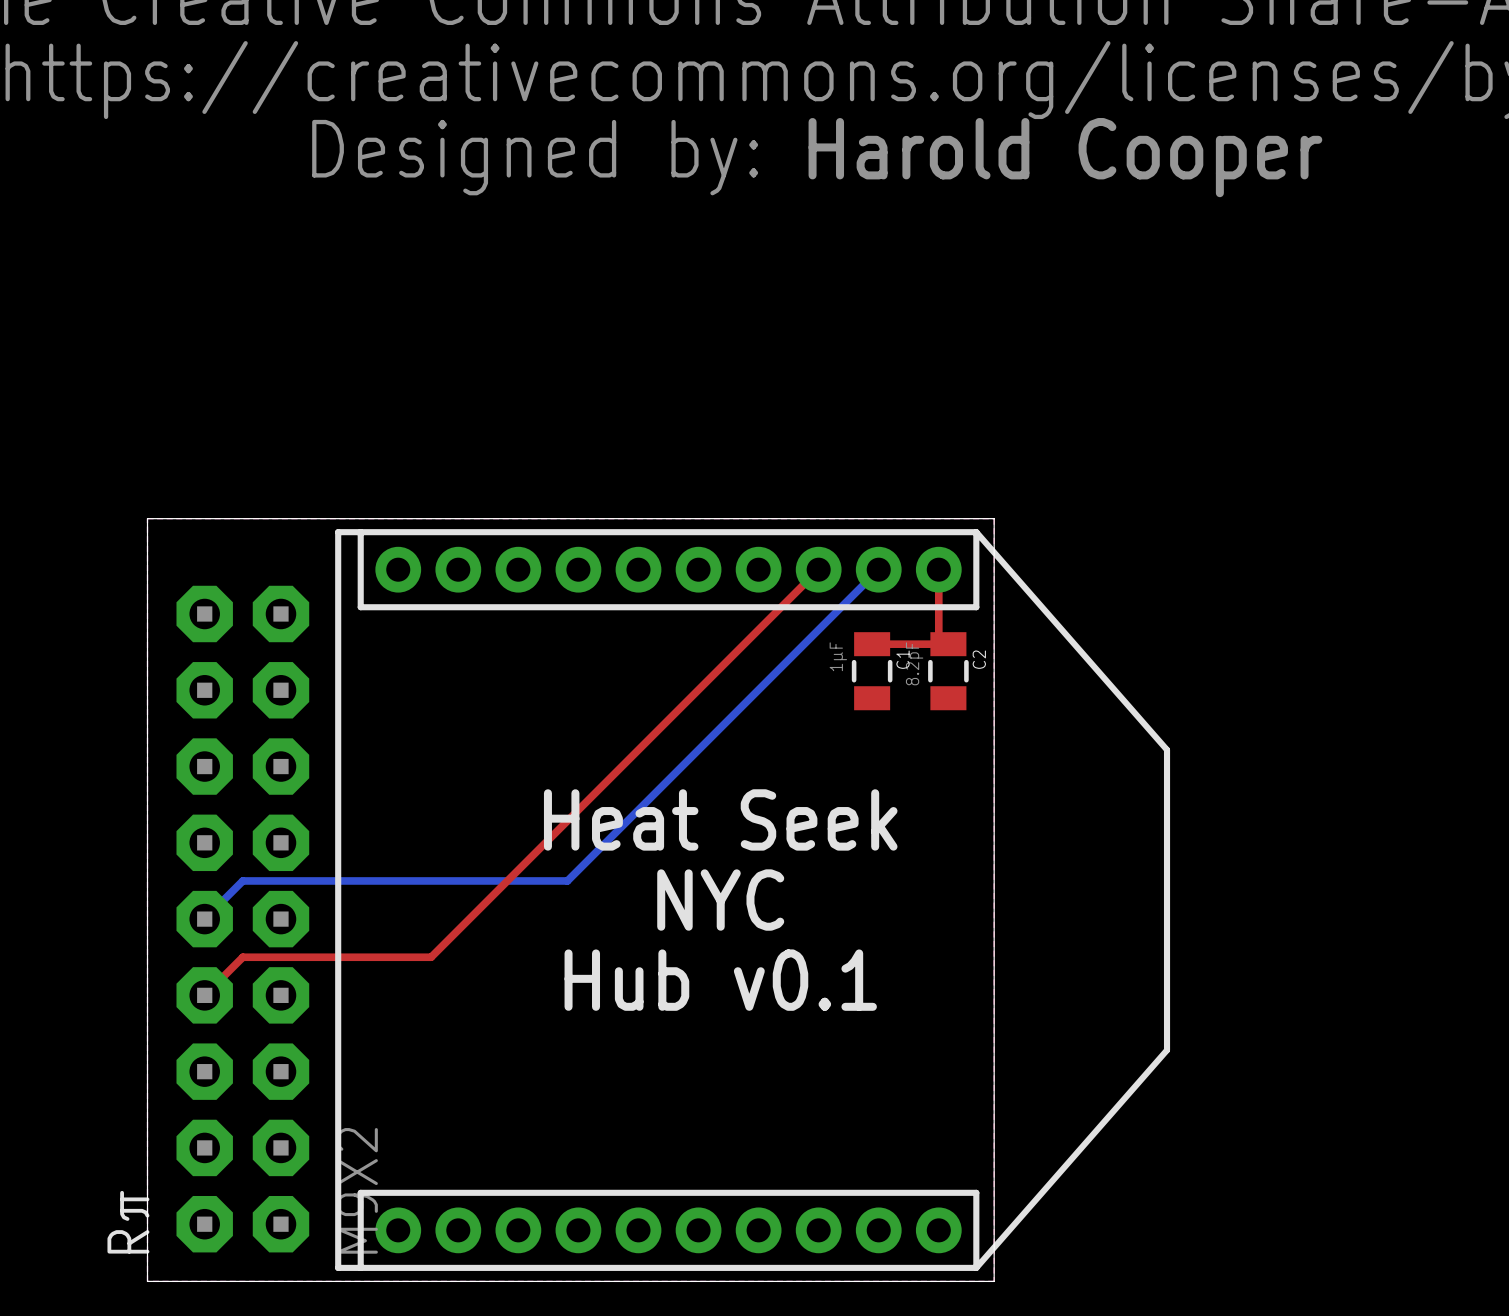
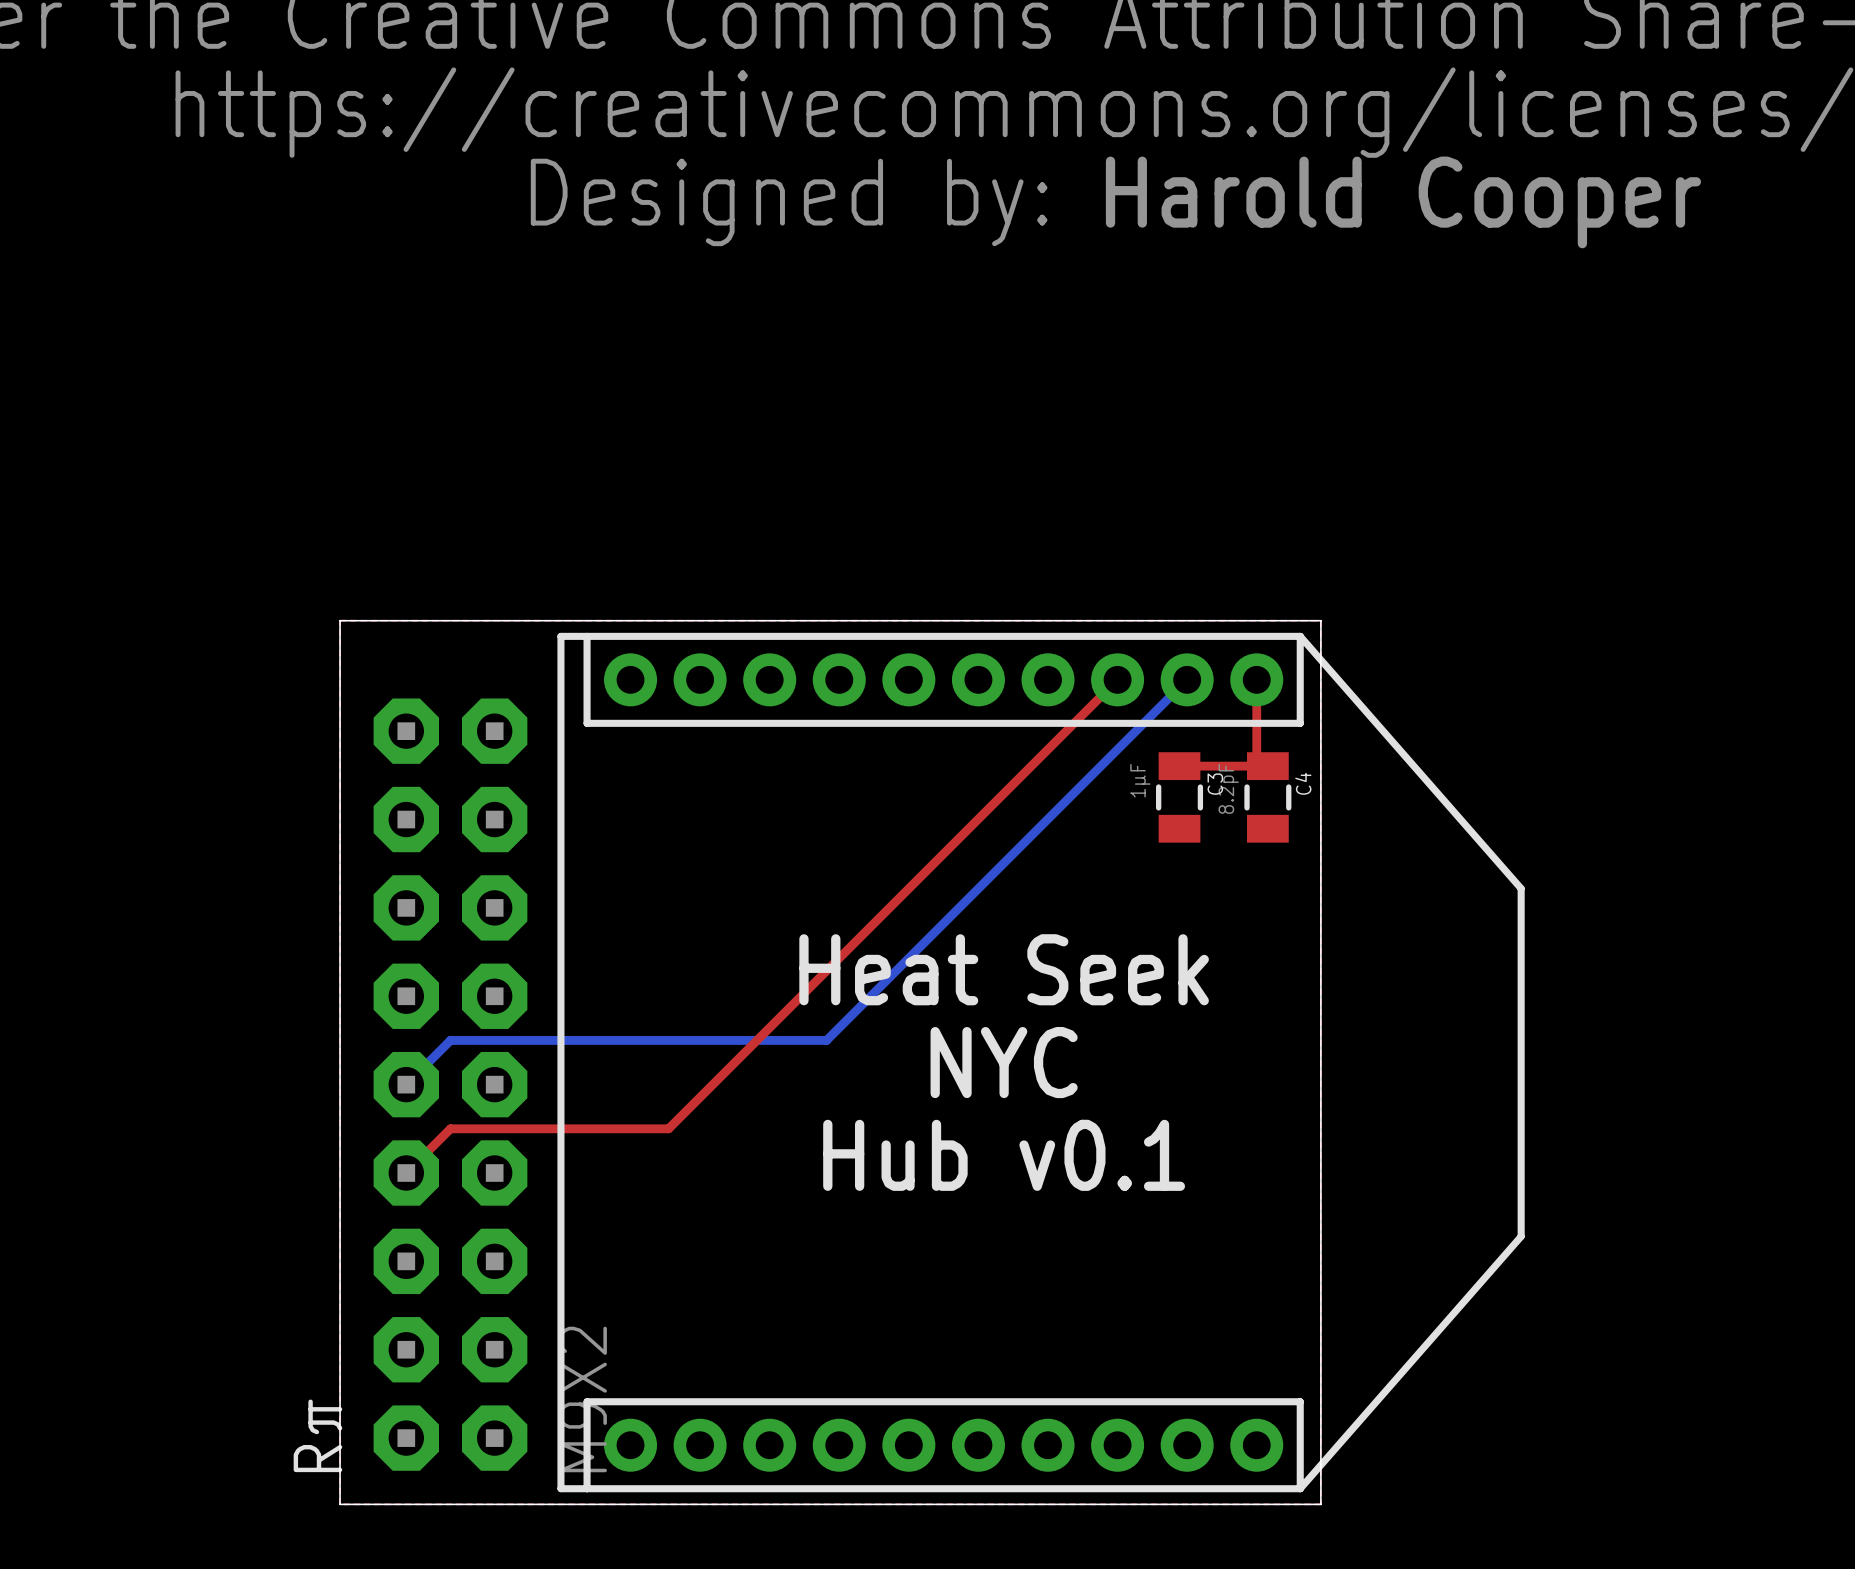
C1 name: C1 (903, 659) -> C3 (1215, 784)
C2 name: C2 (979, 659) -> C4 (1303, 783)

